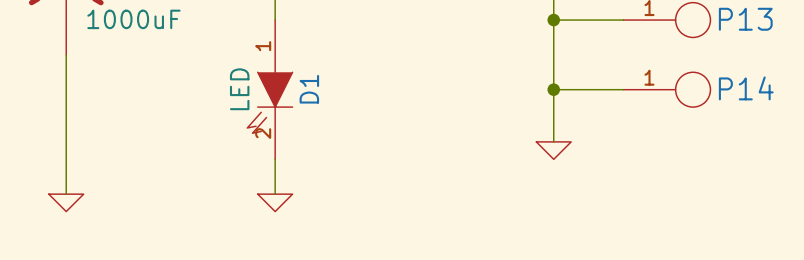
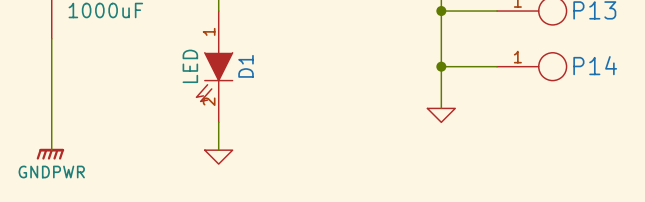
power symbol shape: [48, 194, 84, 212] -> [36, 148, 65, 160]
power symbol text: none -> GNDPWR (51, 172)

